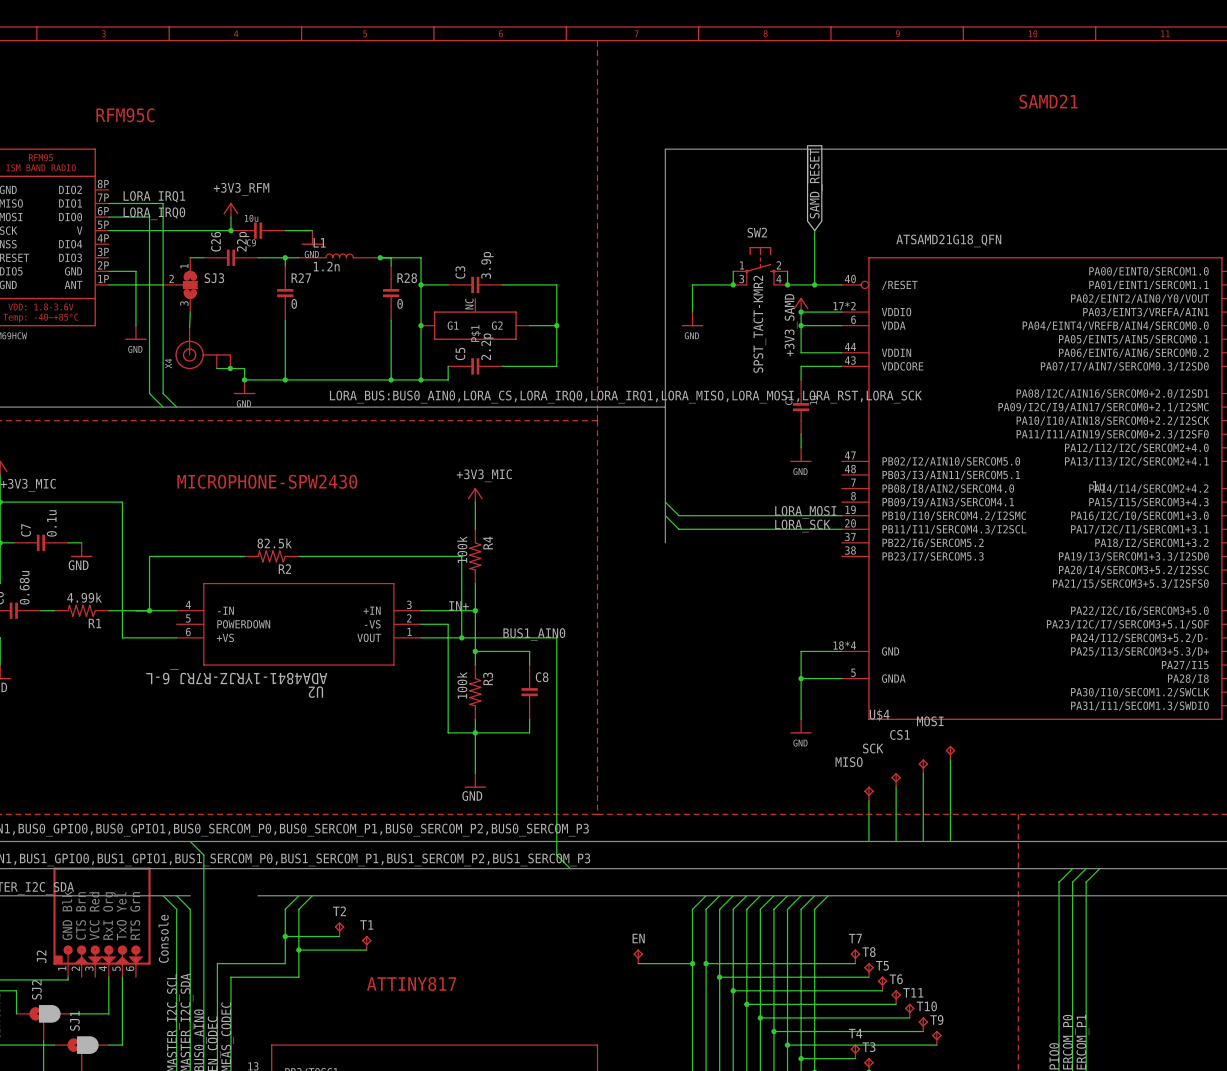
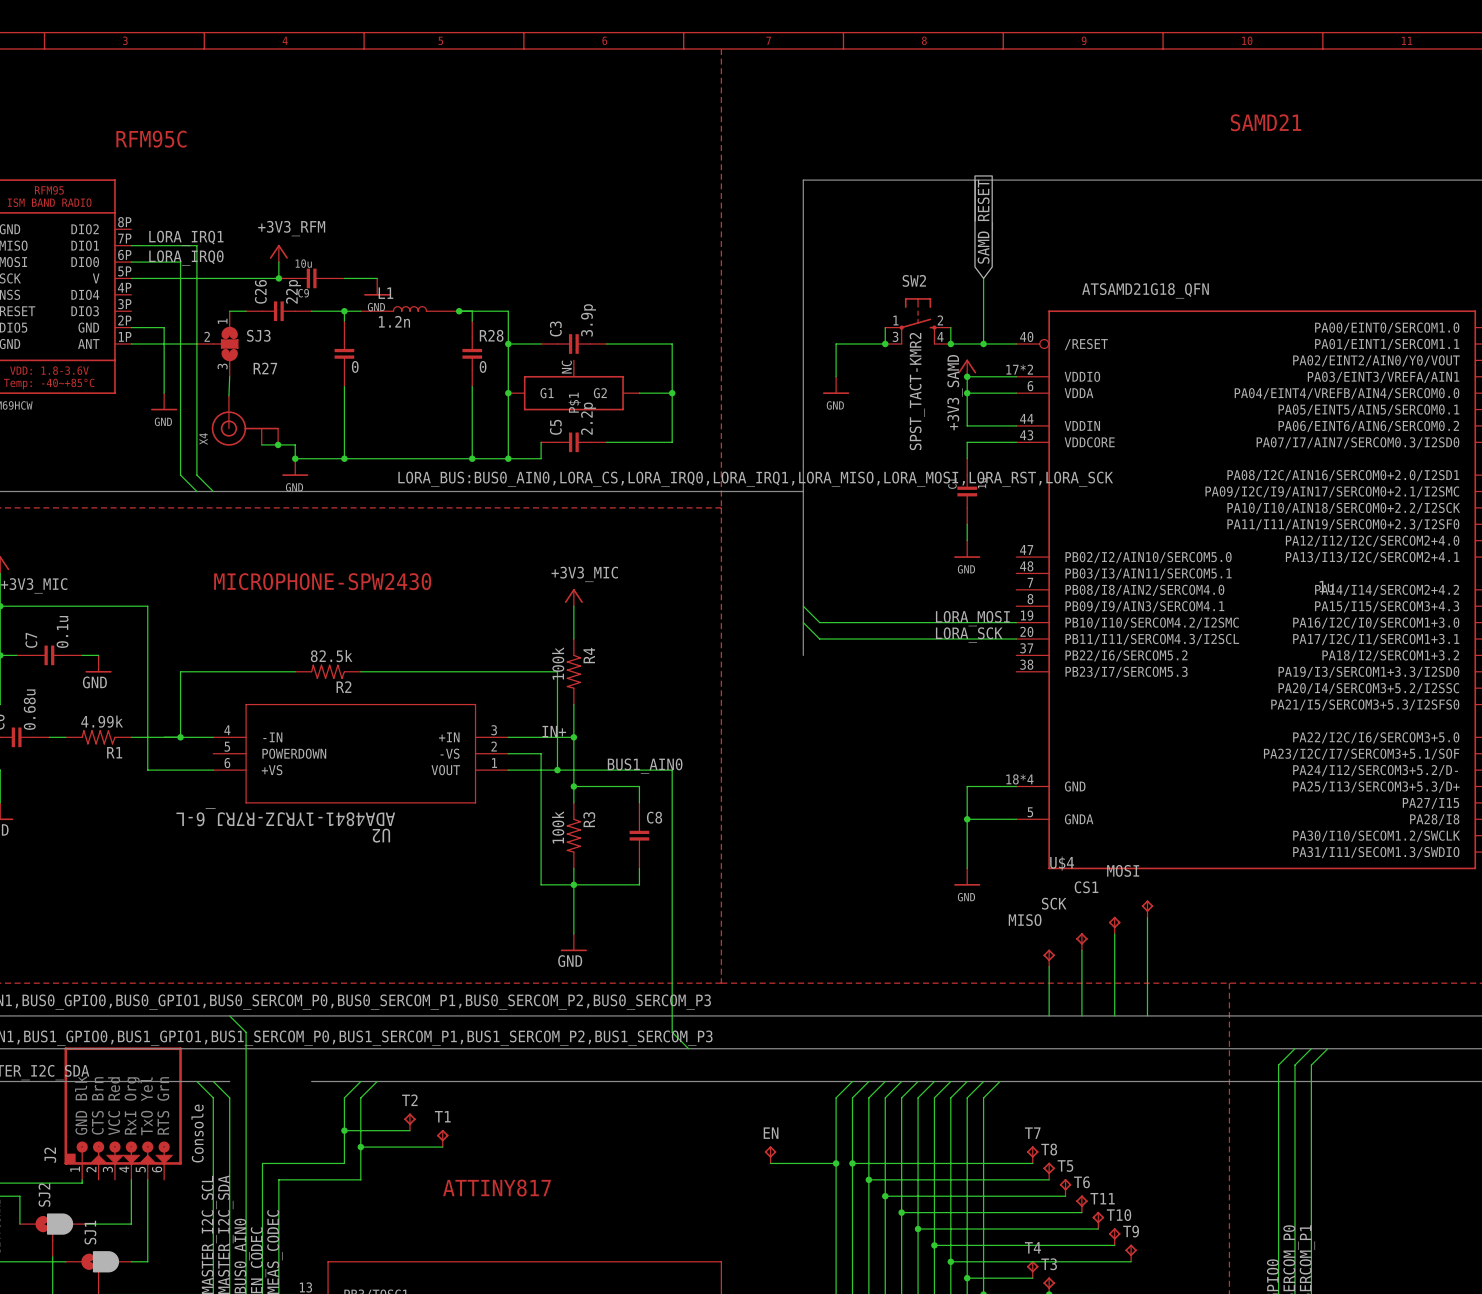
R27 name position: R27 (301, 278) -> R27 (265, 368)

